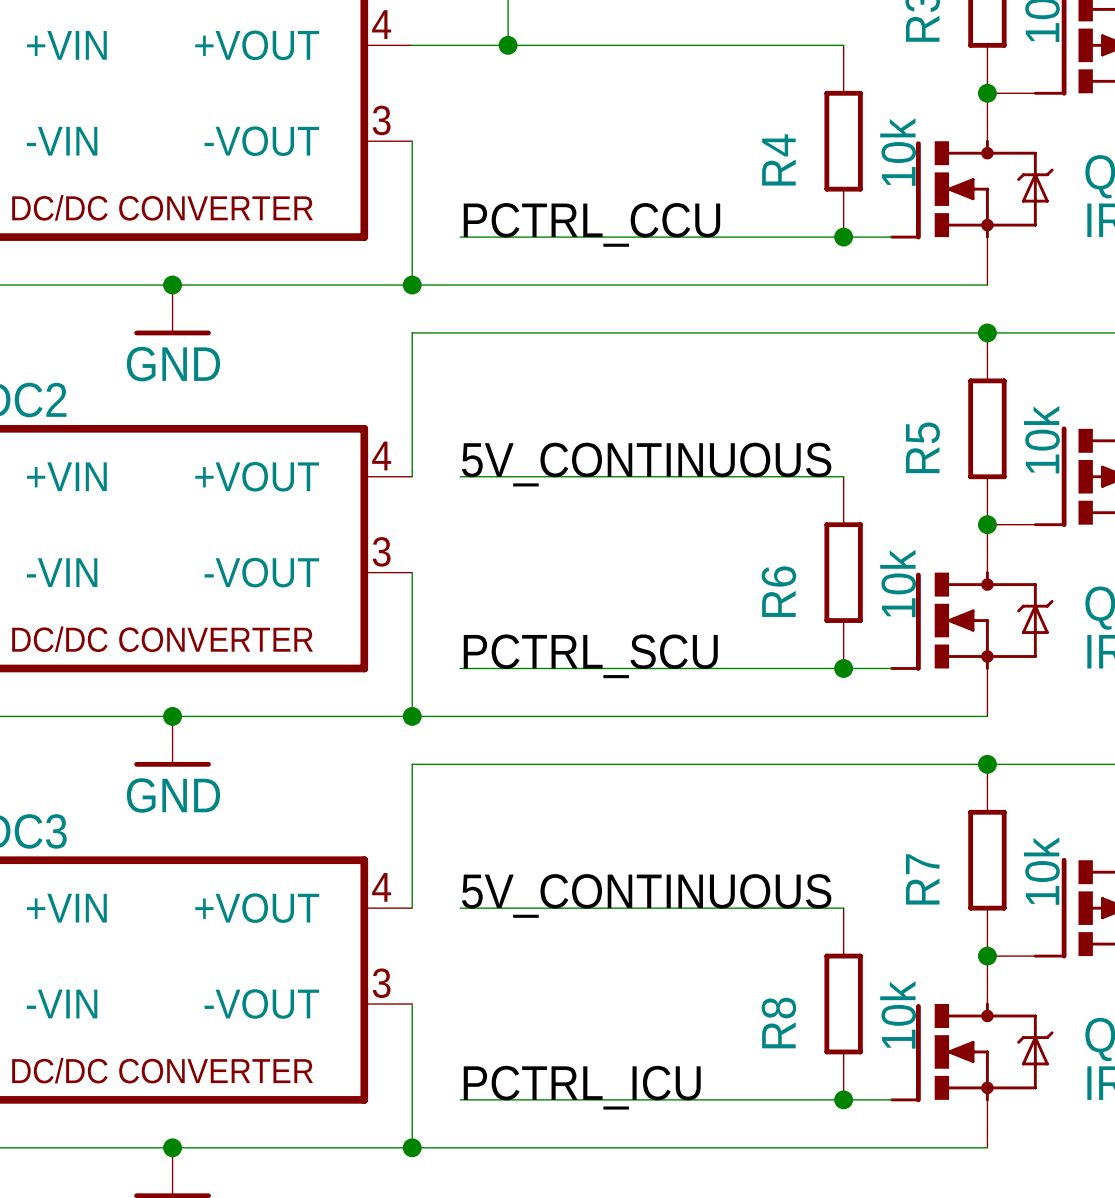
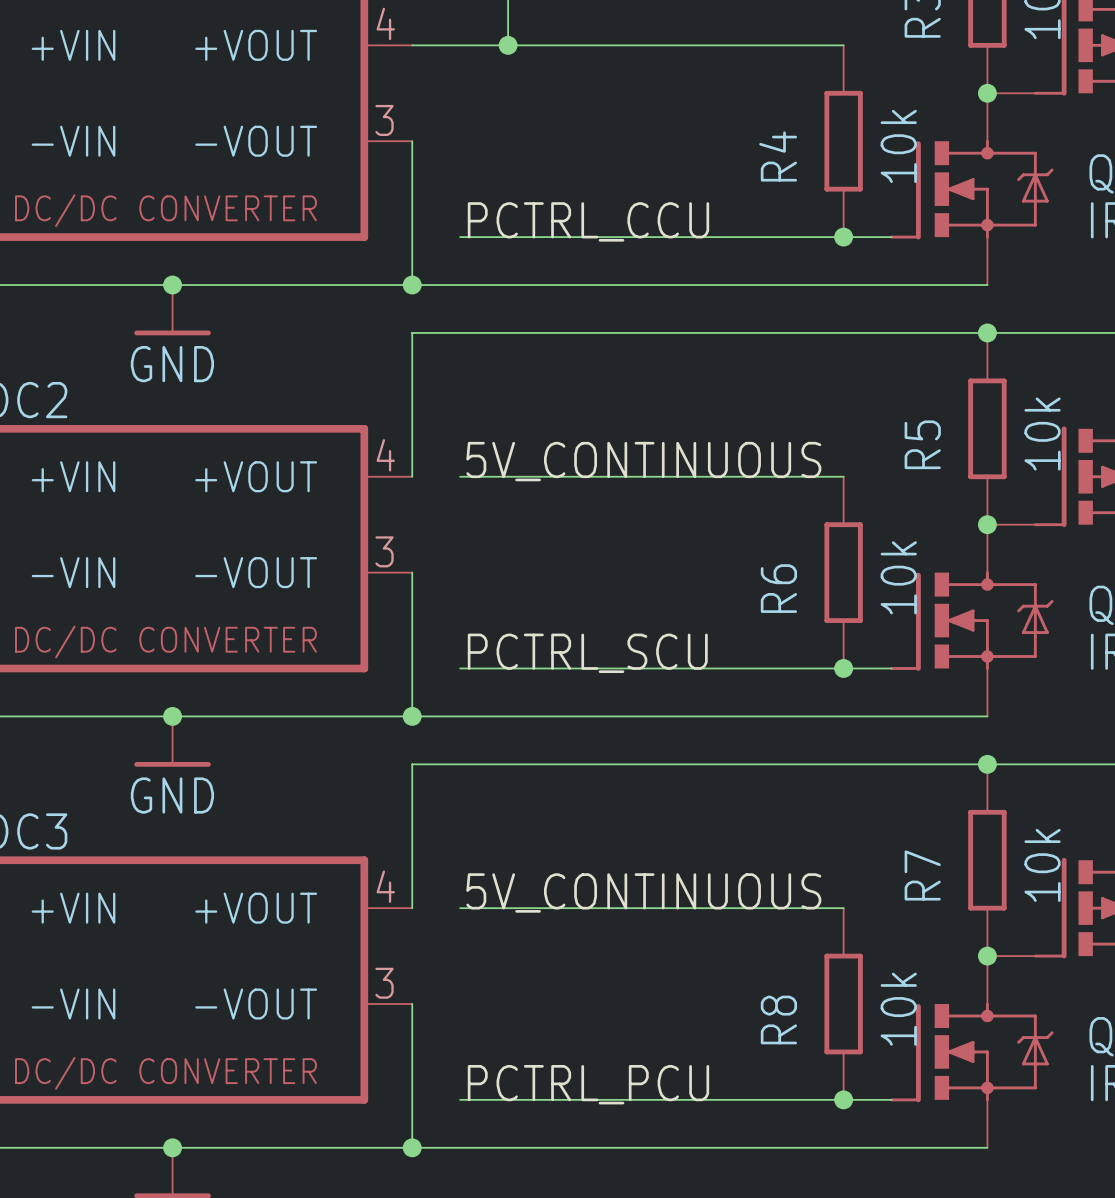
label: PCTRL_ICU (582, 1087) -> PCTRL_PCU (588, 1084)

